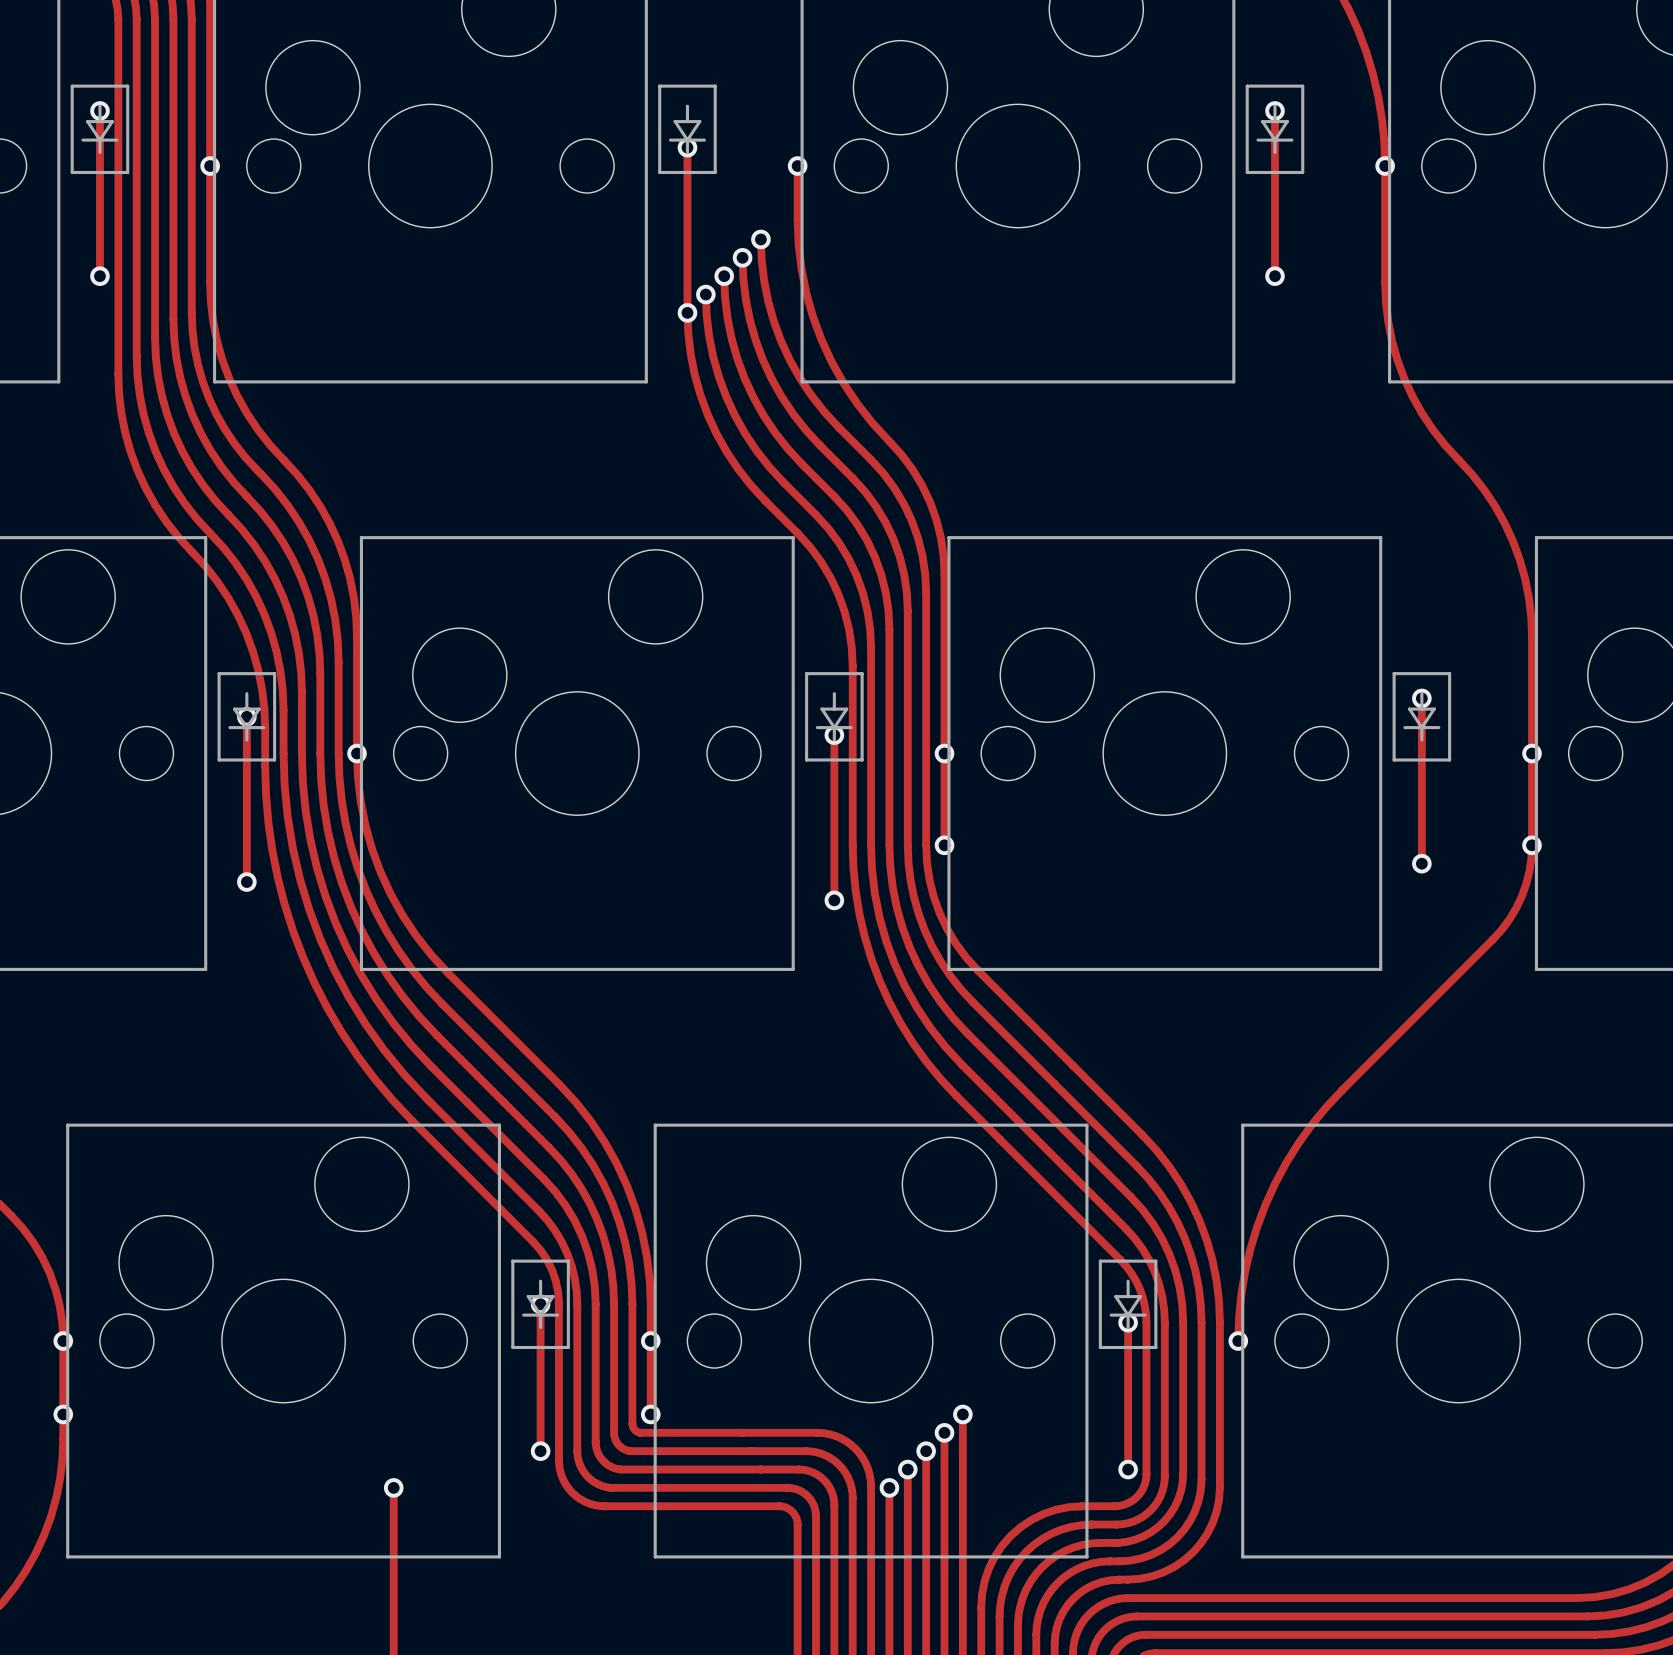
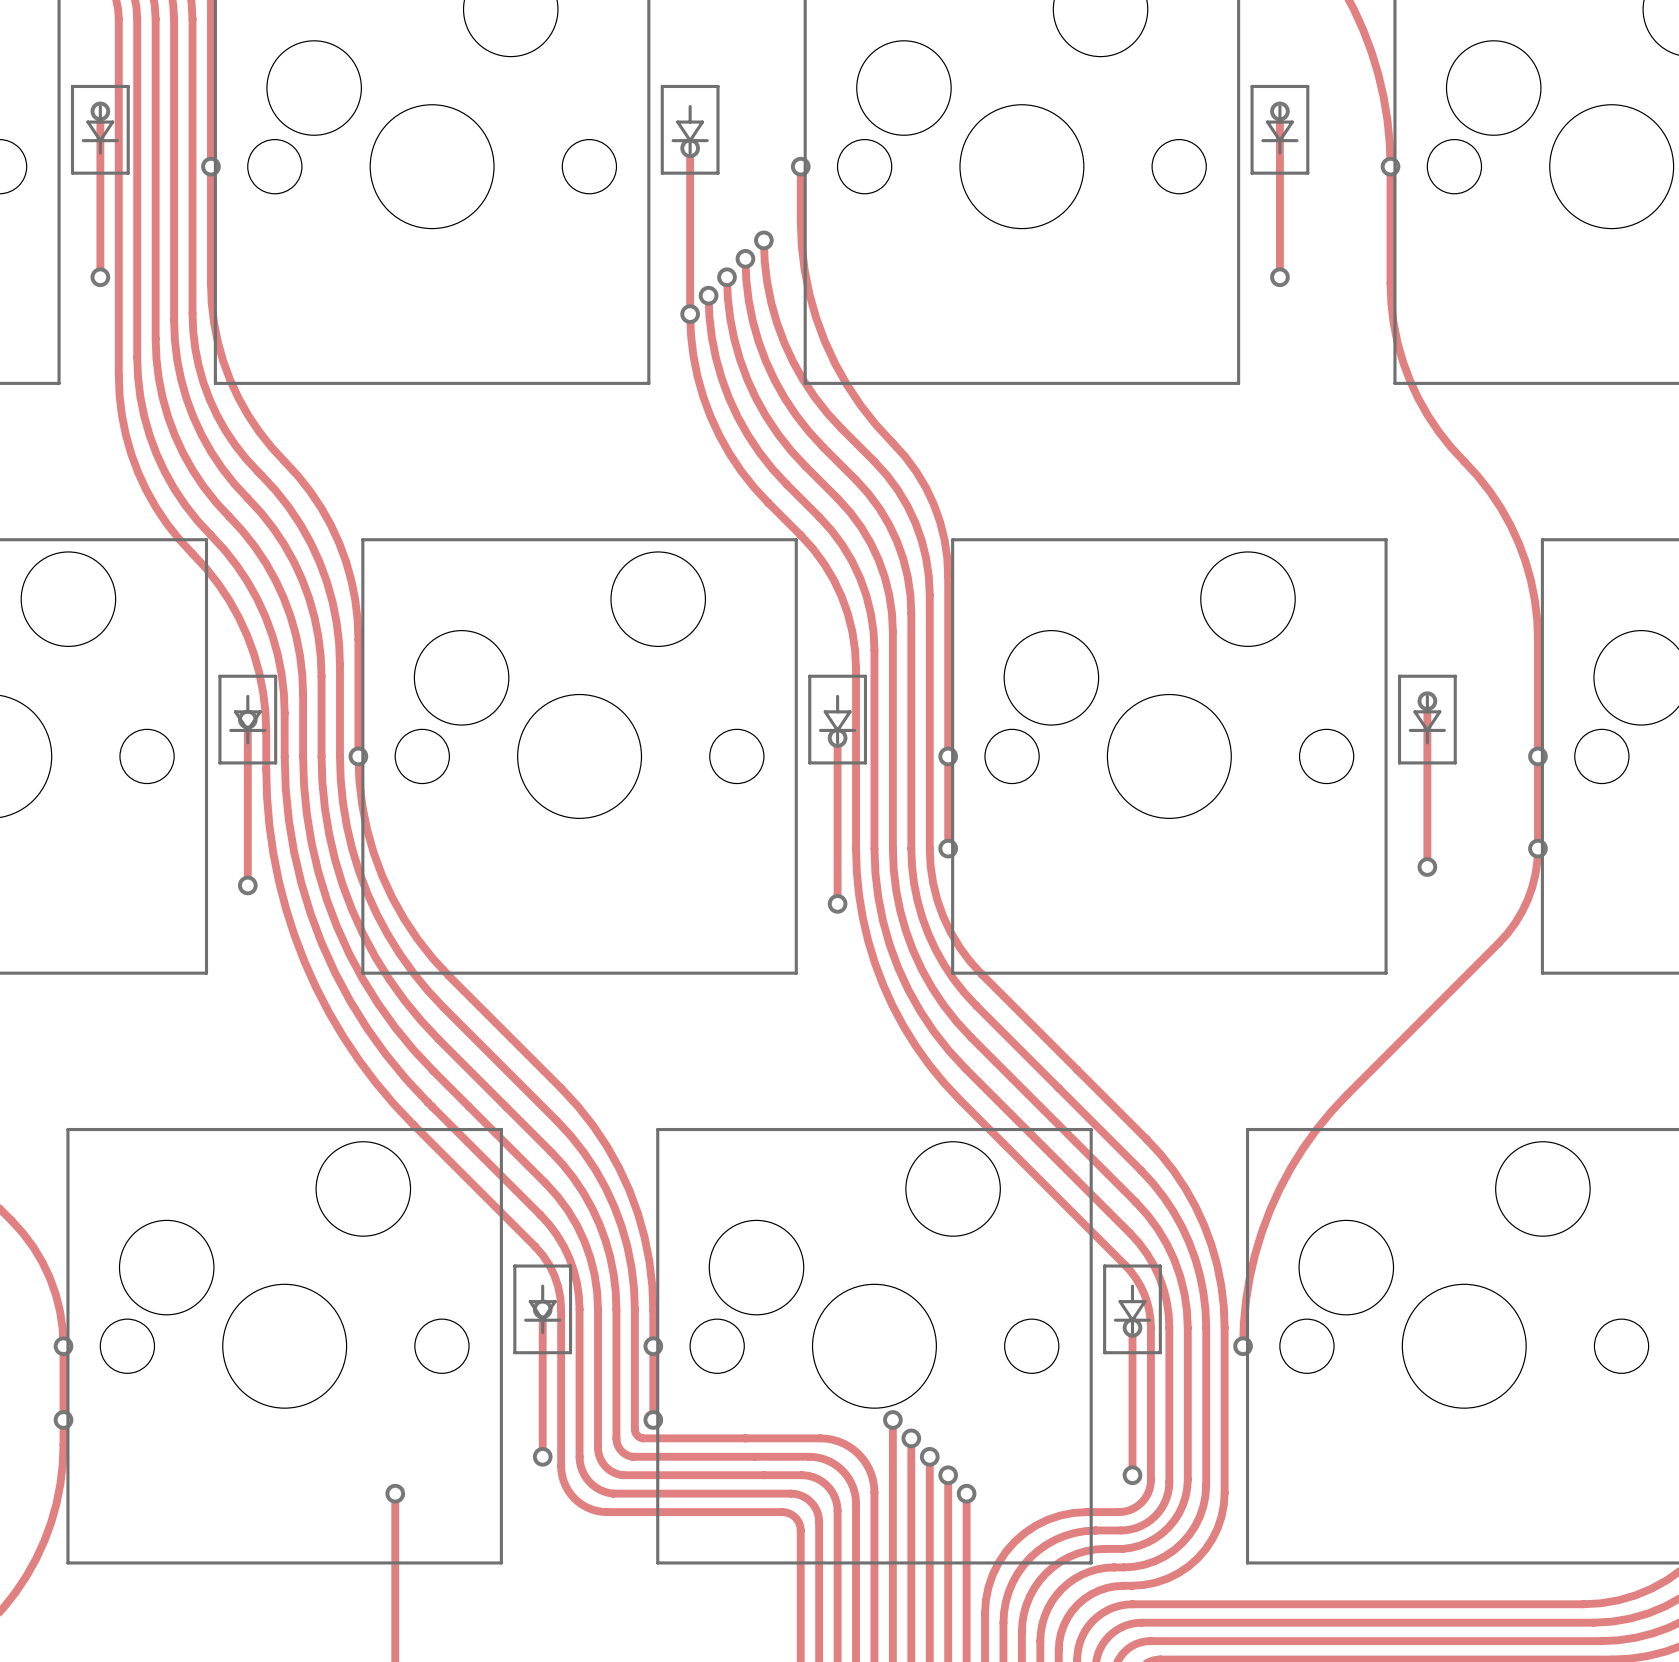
via: none -> (892, 1419)
track: (962, 1414) (962, 1487) -> (892, 1419) (892, 1493)
via: (962, 1414) -> none
via: none -> (911, 1438)
track: (944, 1432) (944, 1469) -> (911, 1438) (911, 1475)
via: (944, 1432) -> none
via: (907, 1469) -> none
via: none -> (948, 1475)
via: (889, 1487) -> none
via: none -> (966, 1493)

